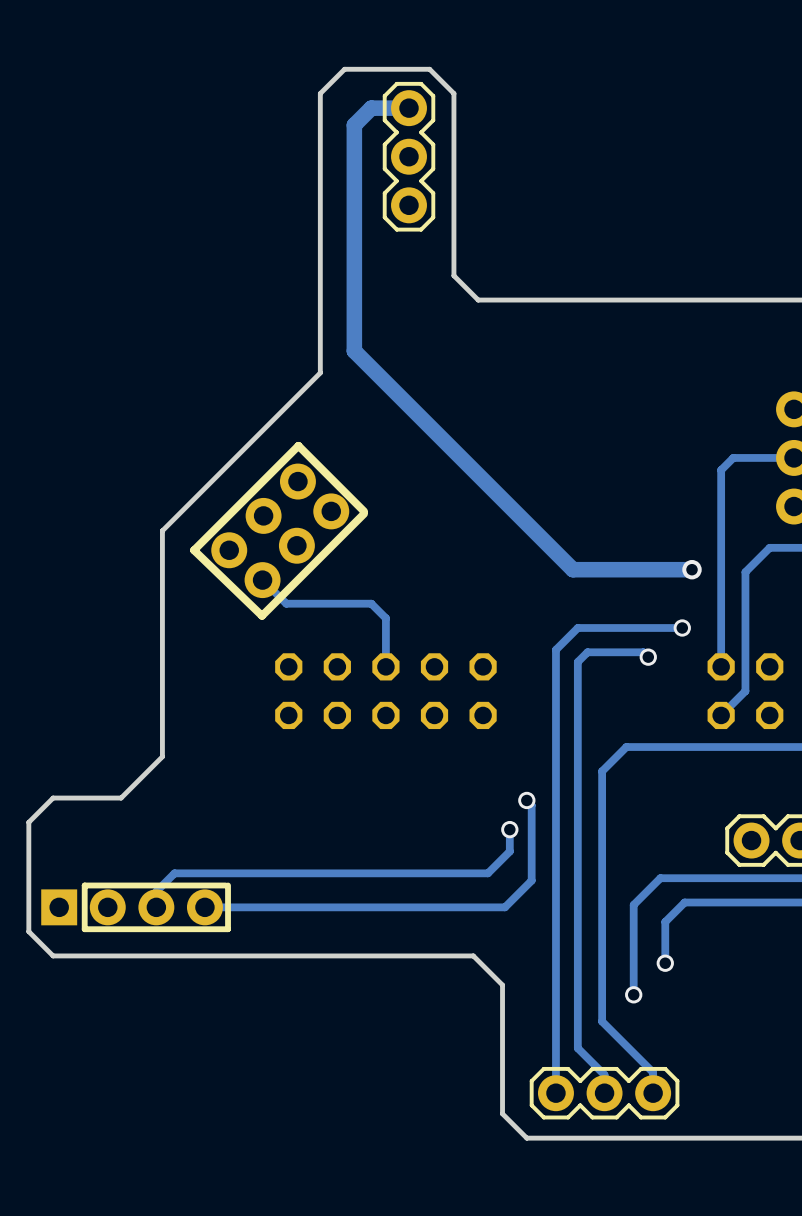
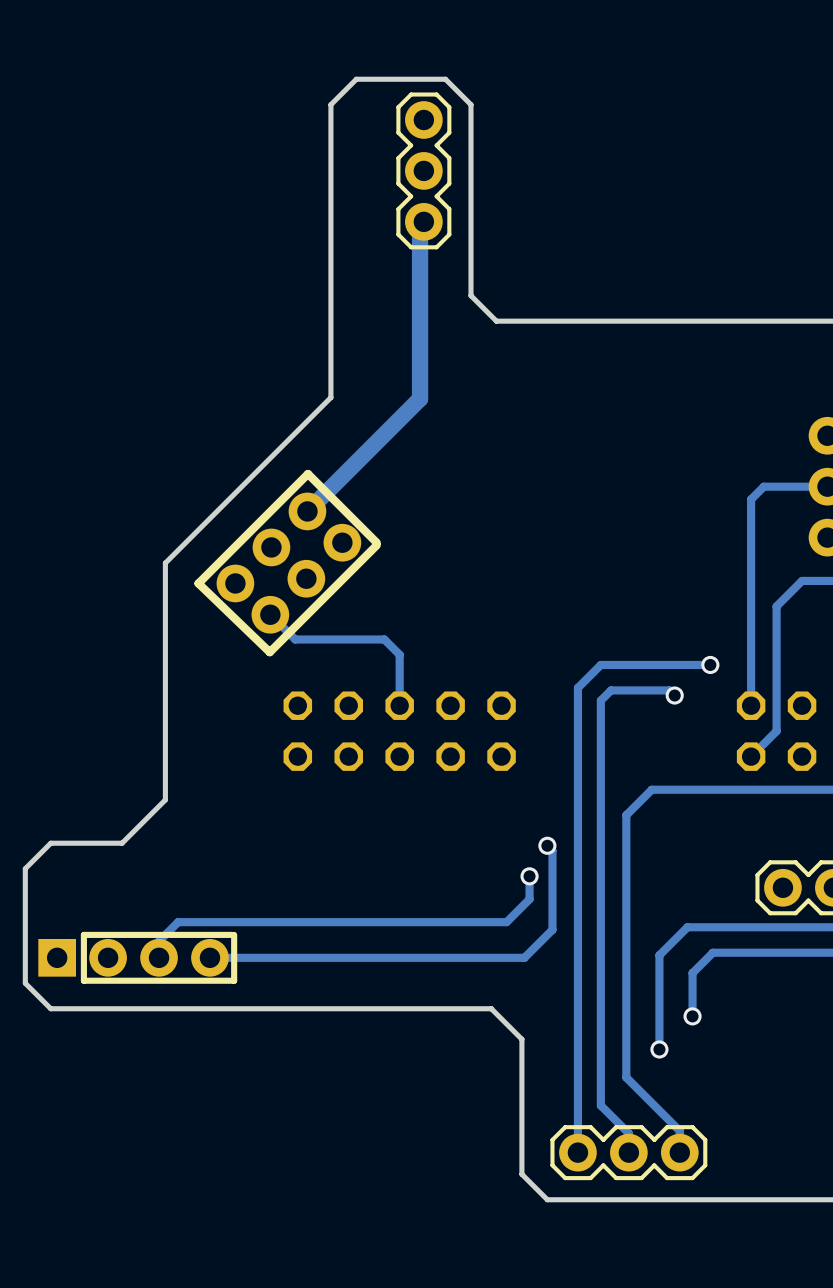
track: (409, 108) (371, 108) (354, 125) (354, 351) (572, 569) (692, 569) -> none
track: none -> (420, 221) (420, 398) (307, 511)
via: (692, 569) -> none

